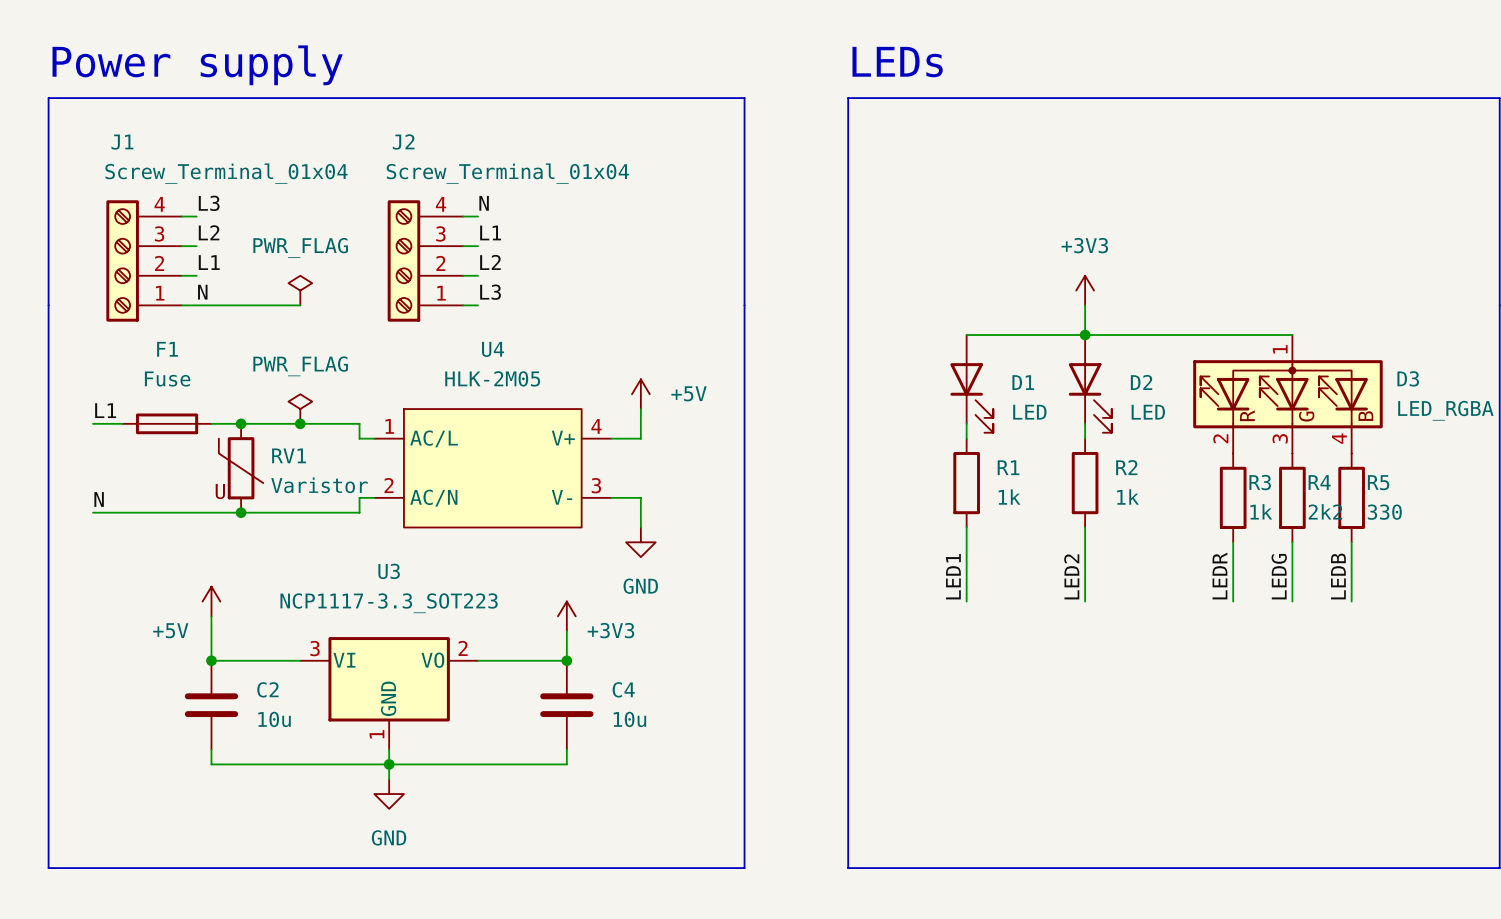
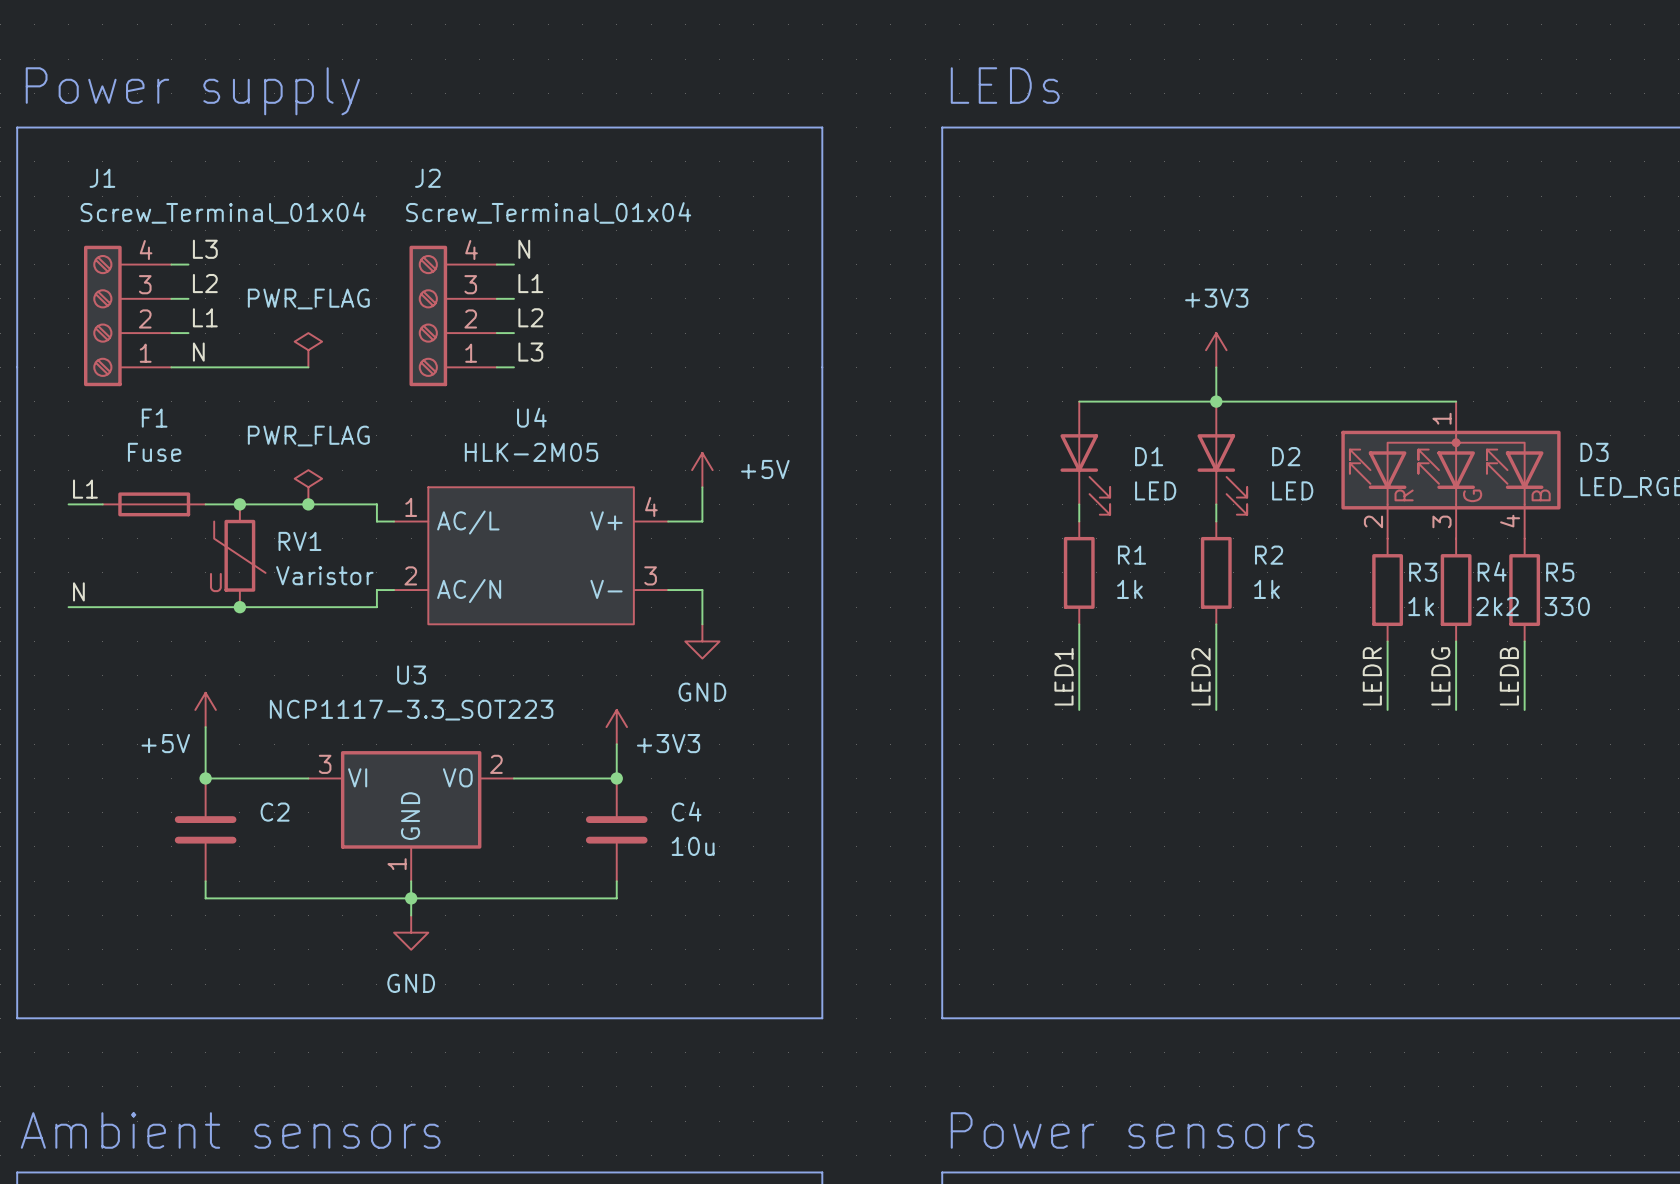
C2 value: 10u (274, 719) -> none

